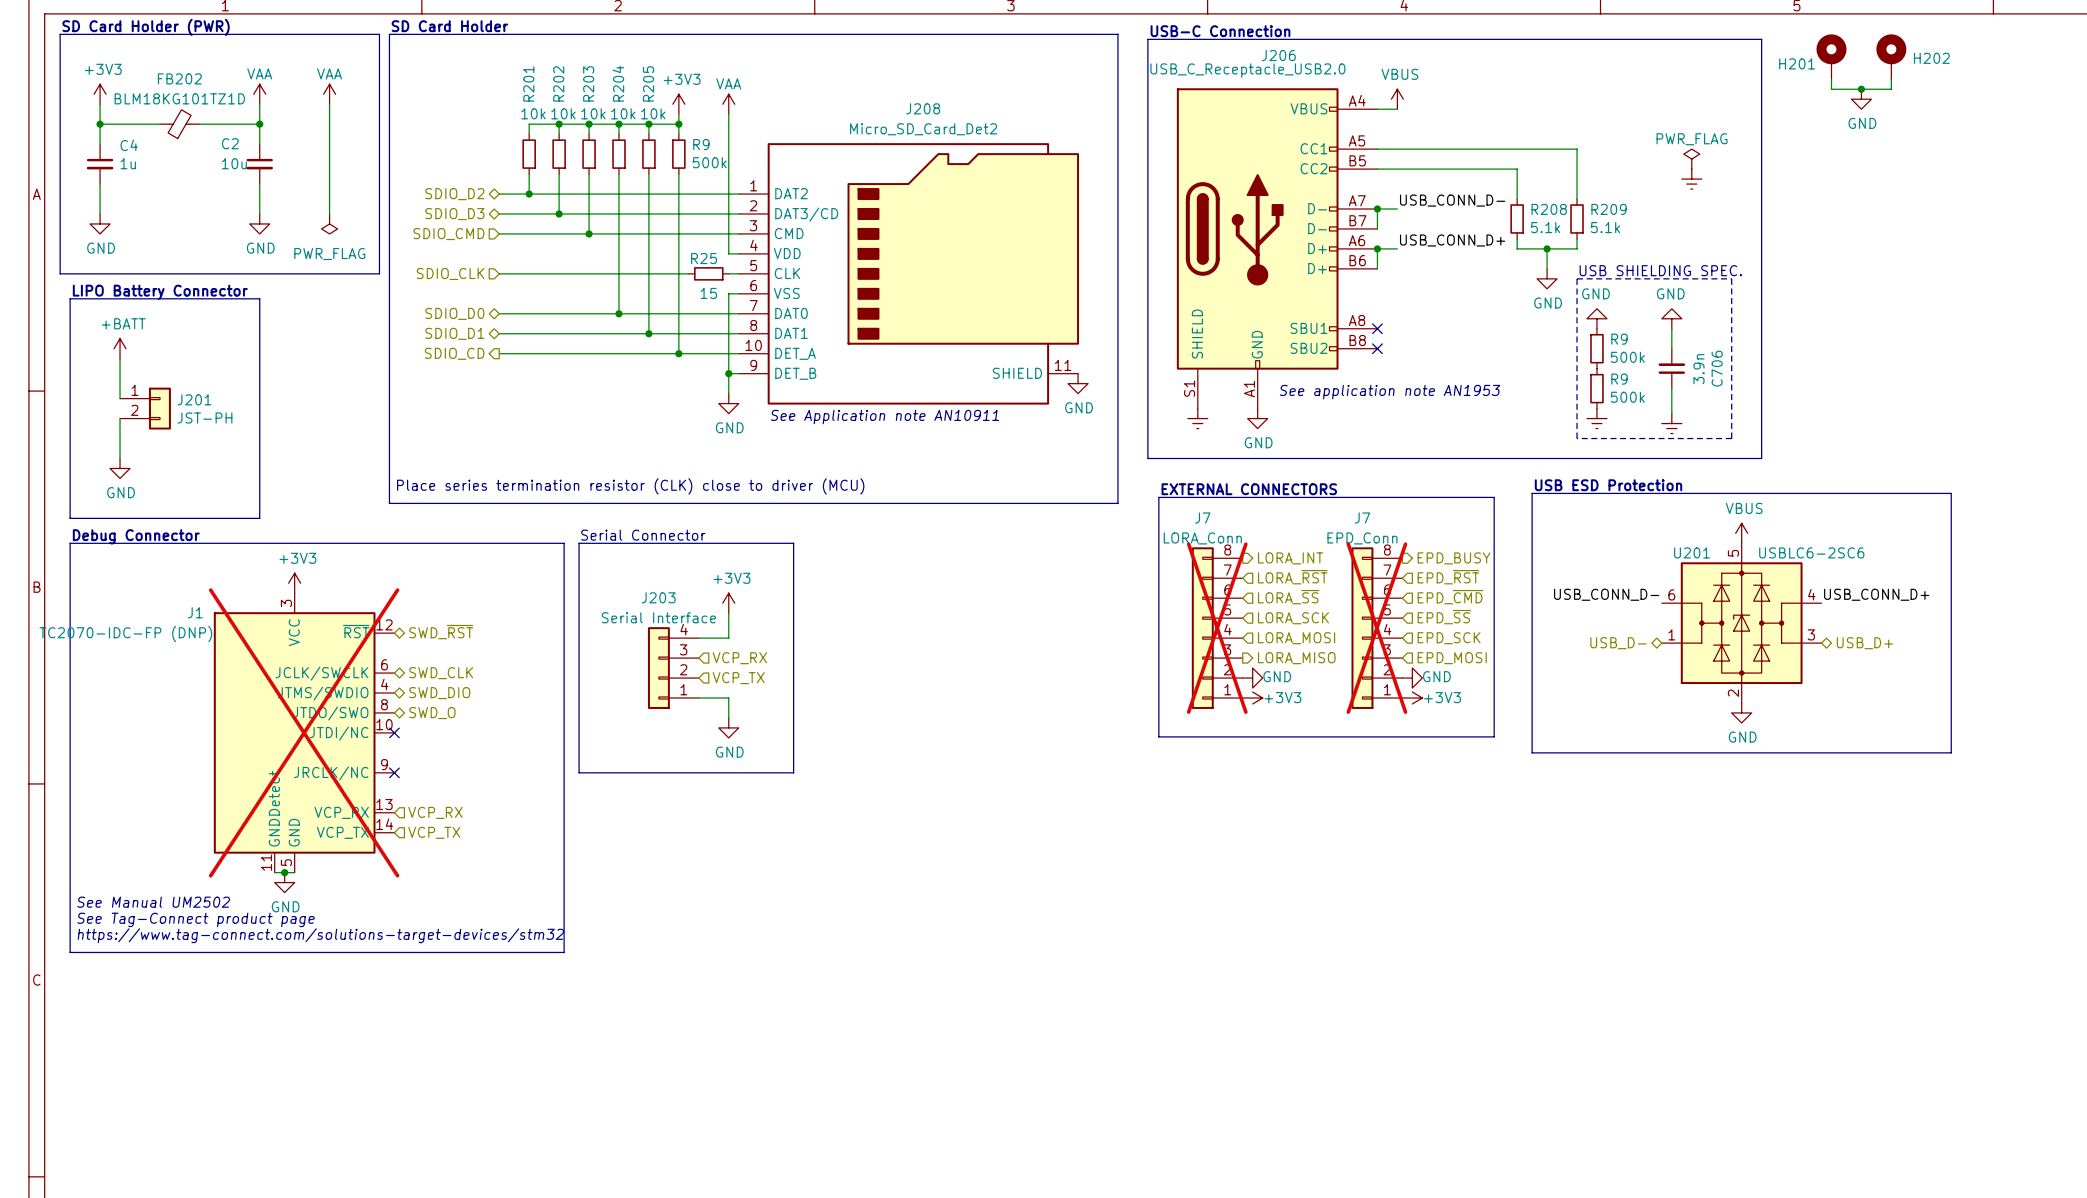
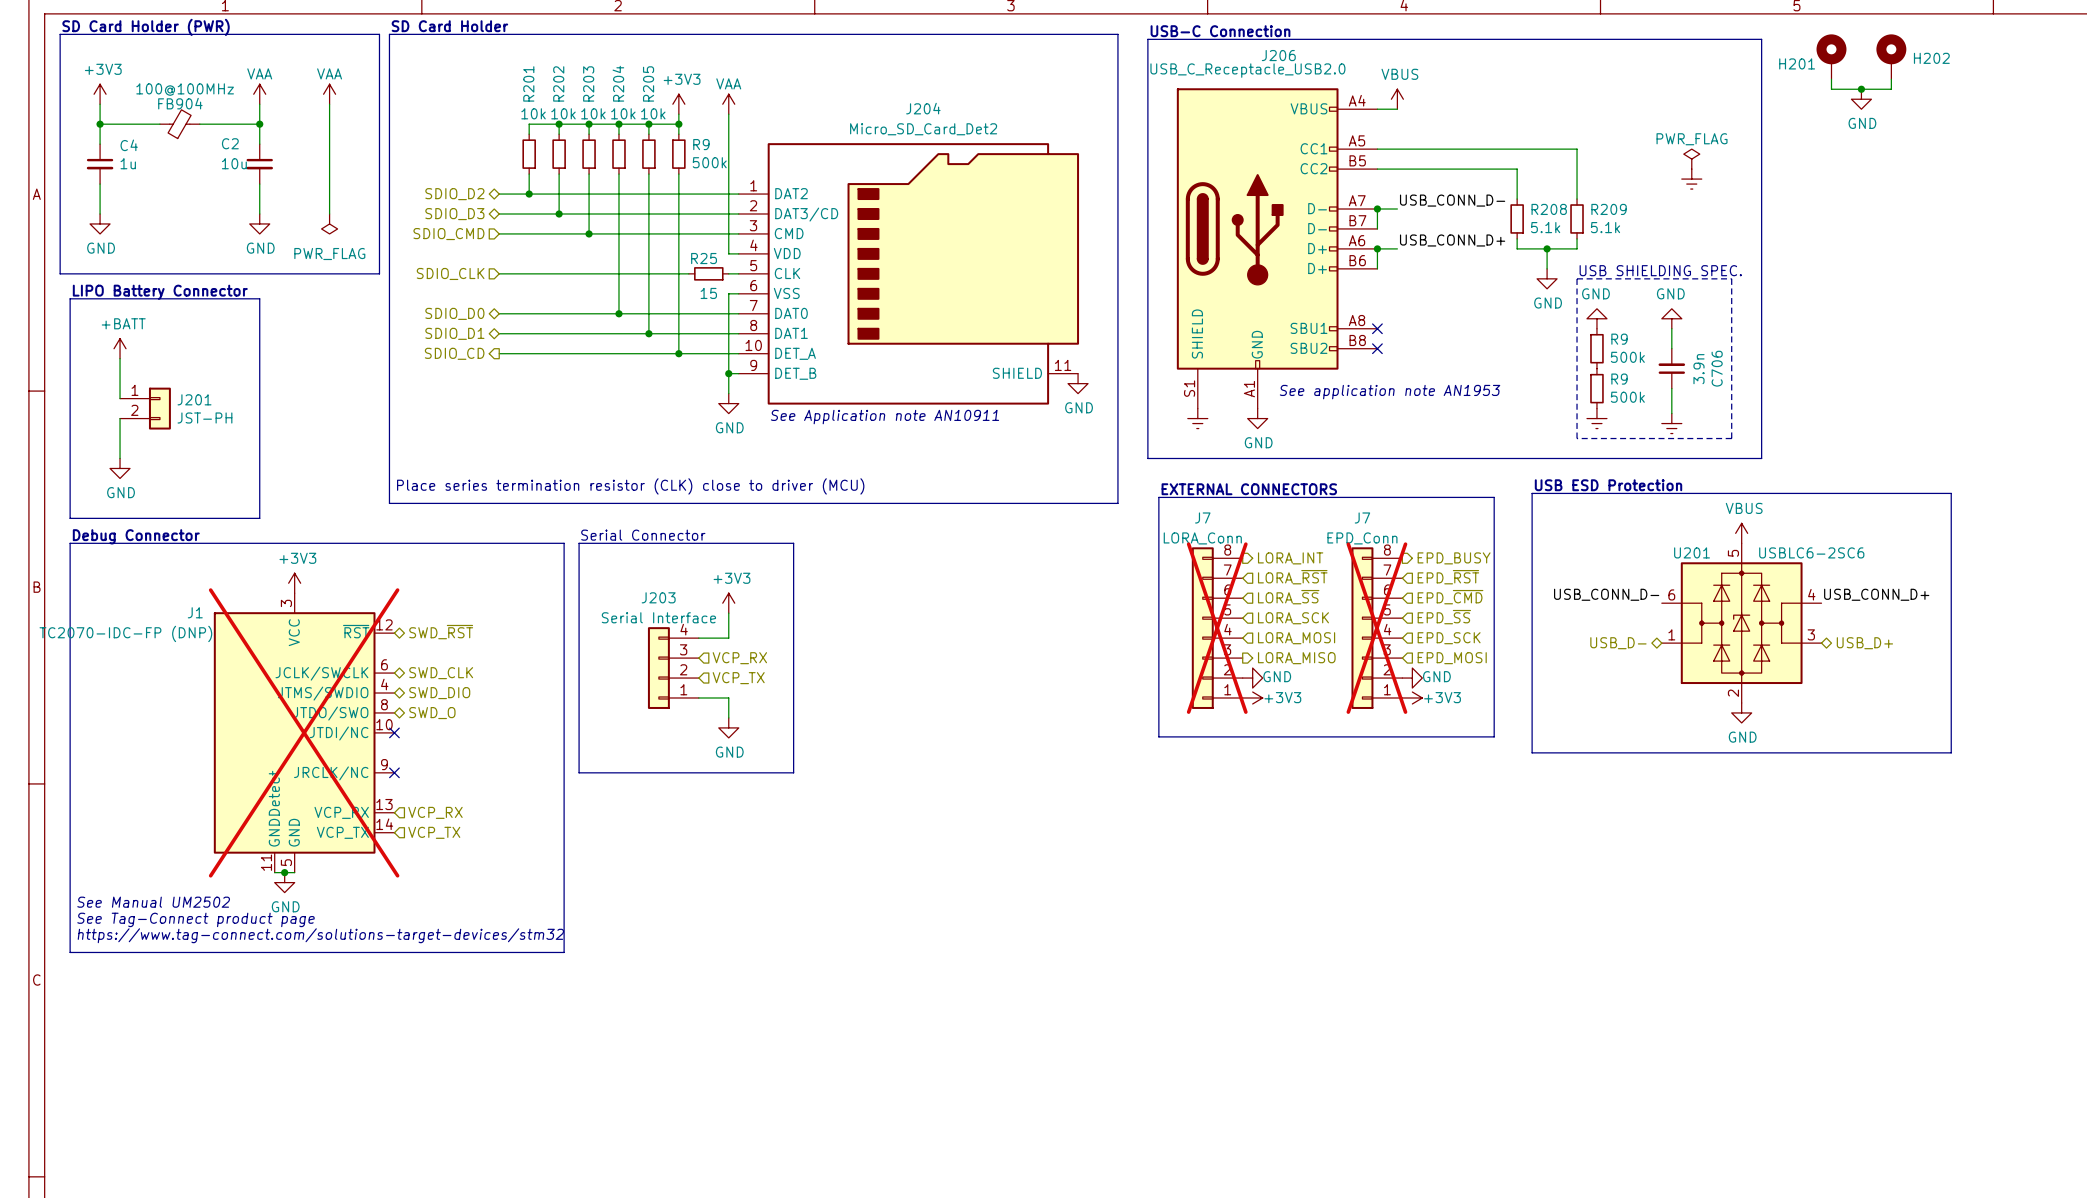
FB202 name: FB202 (179, 78) -> FB904 (180, 103)
FB202 value: BLM18KG101TZ1D (179, 98) -> 100@100MHz (185, 89)
J208 name: J208 (923, 108) -> J204 (923, 108)

